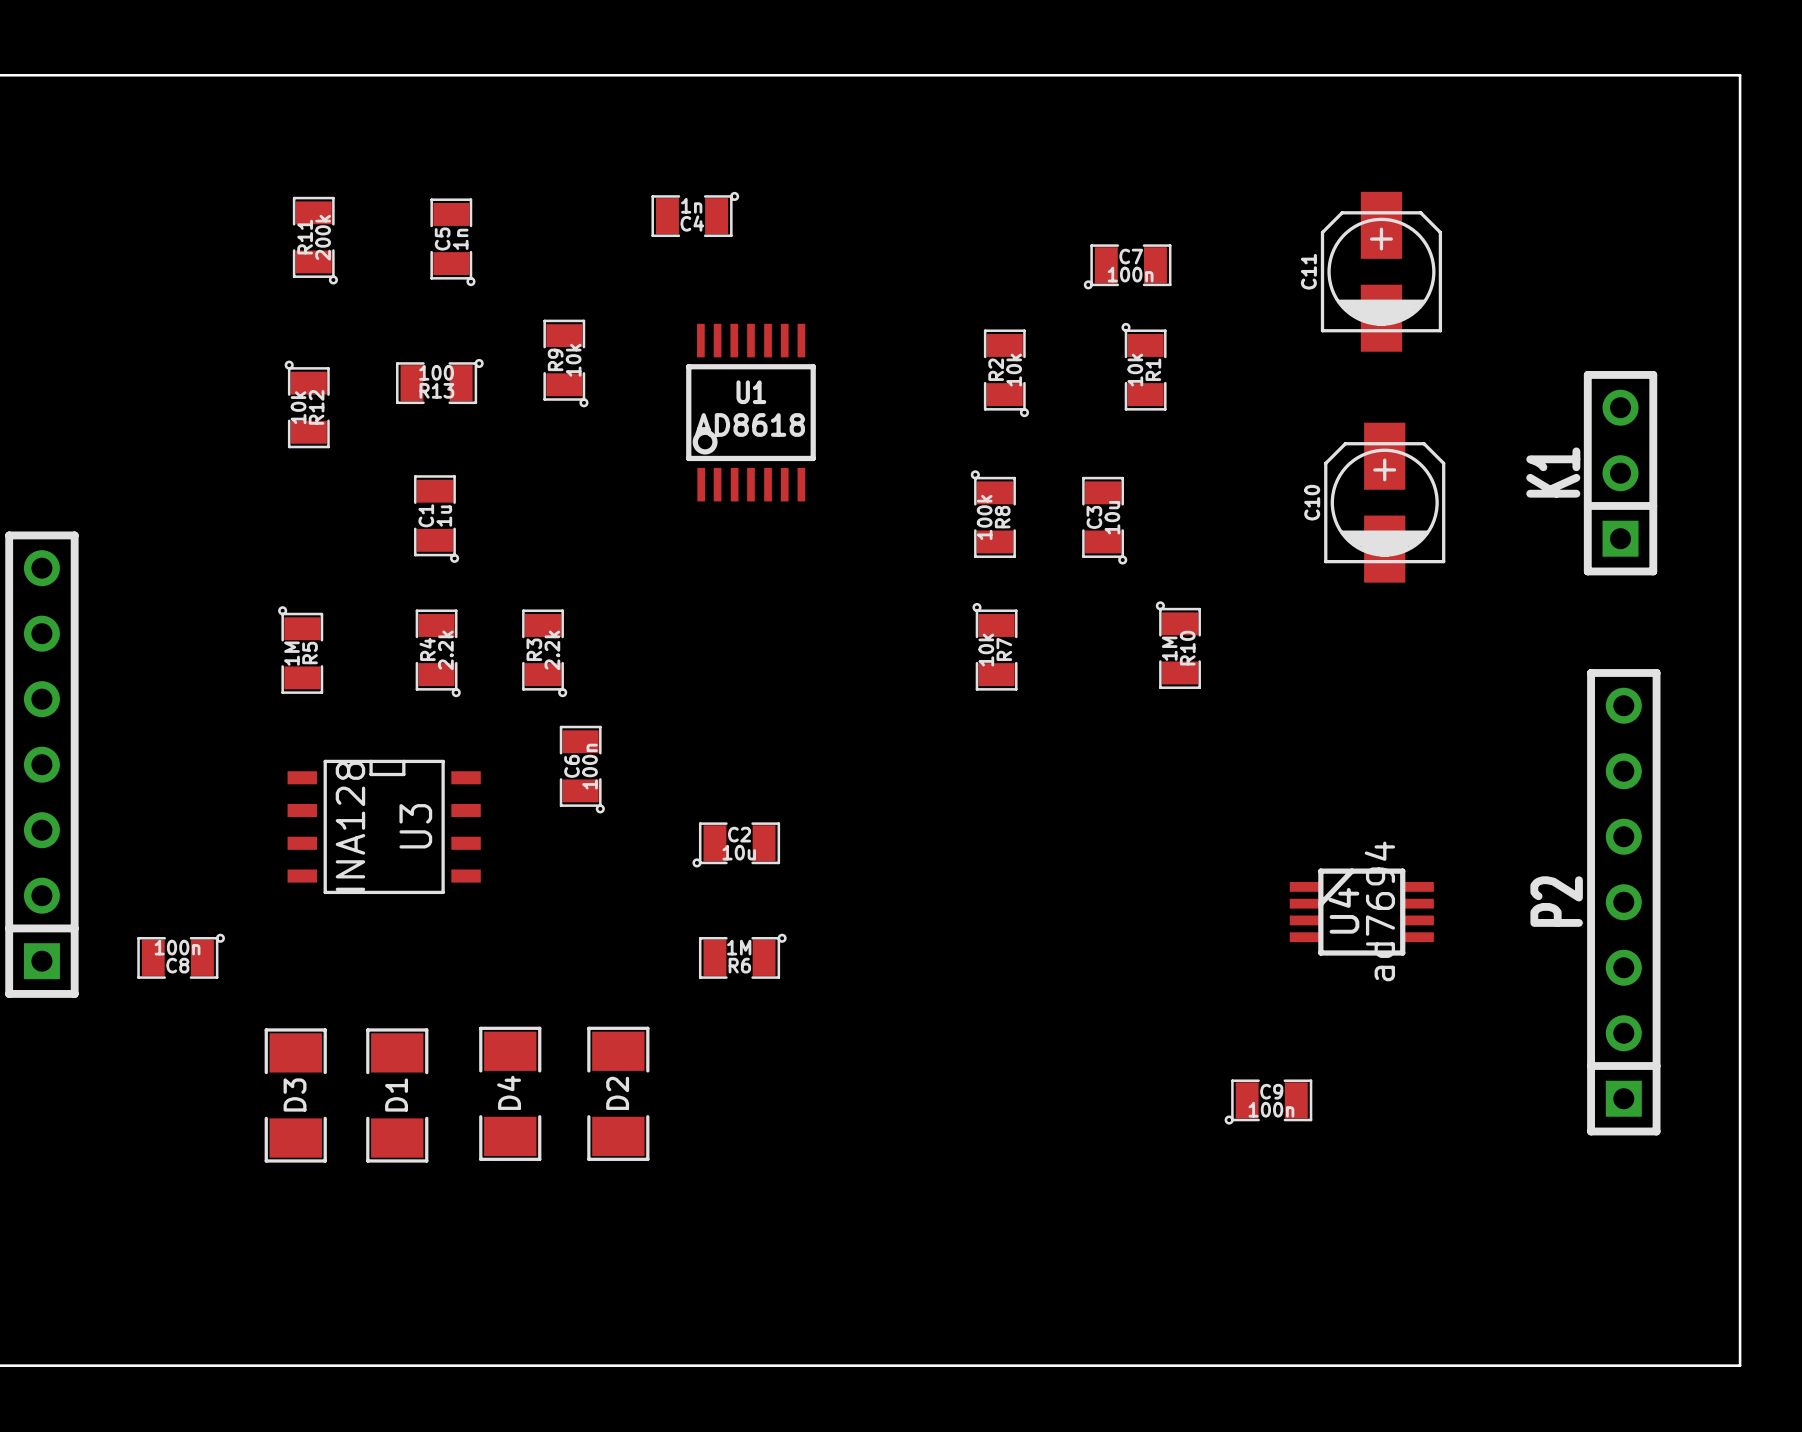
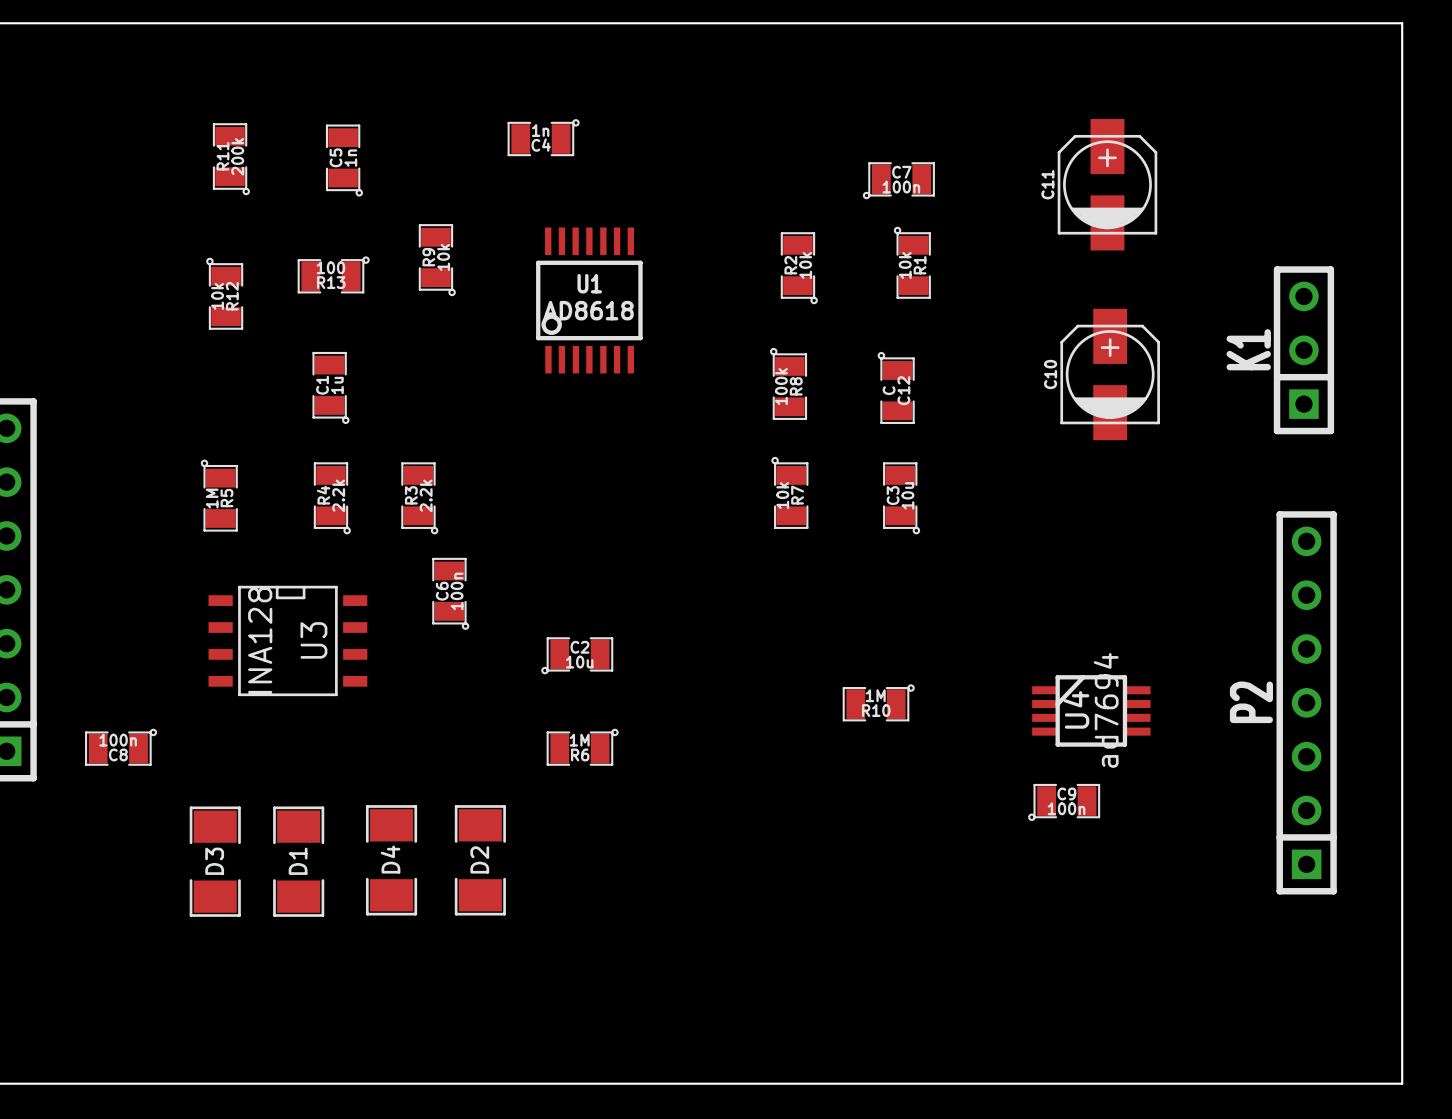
C12: none -> C (896, 387)
C3 position: (1104, 520) -> (901, 498)
R10 rotation: 0° (1178, 645) -> 90° clockwise (878, 702)
R10 position: (1178, 645) -> (878, 702)
C9 position: (1268, 1102) -> (1064, 802)

